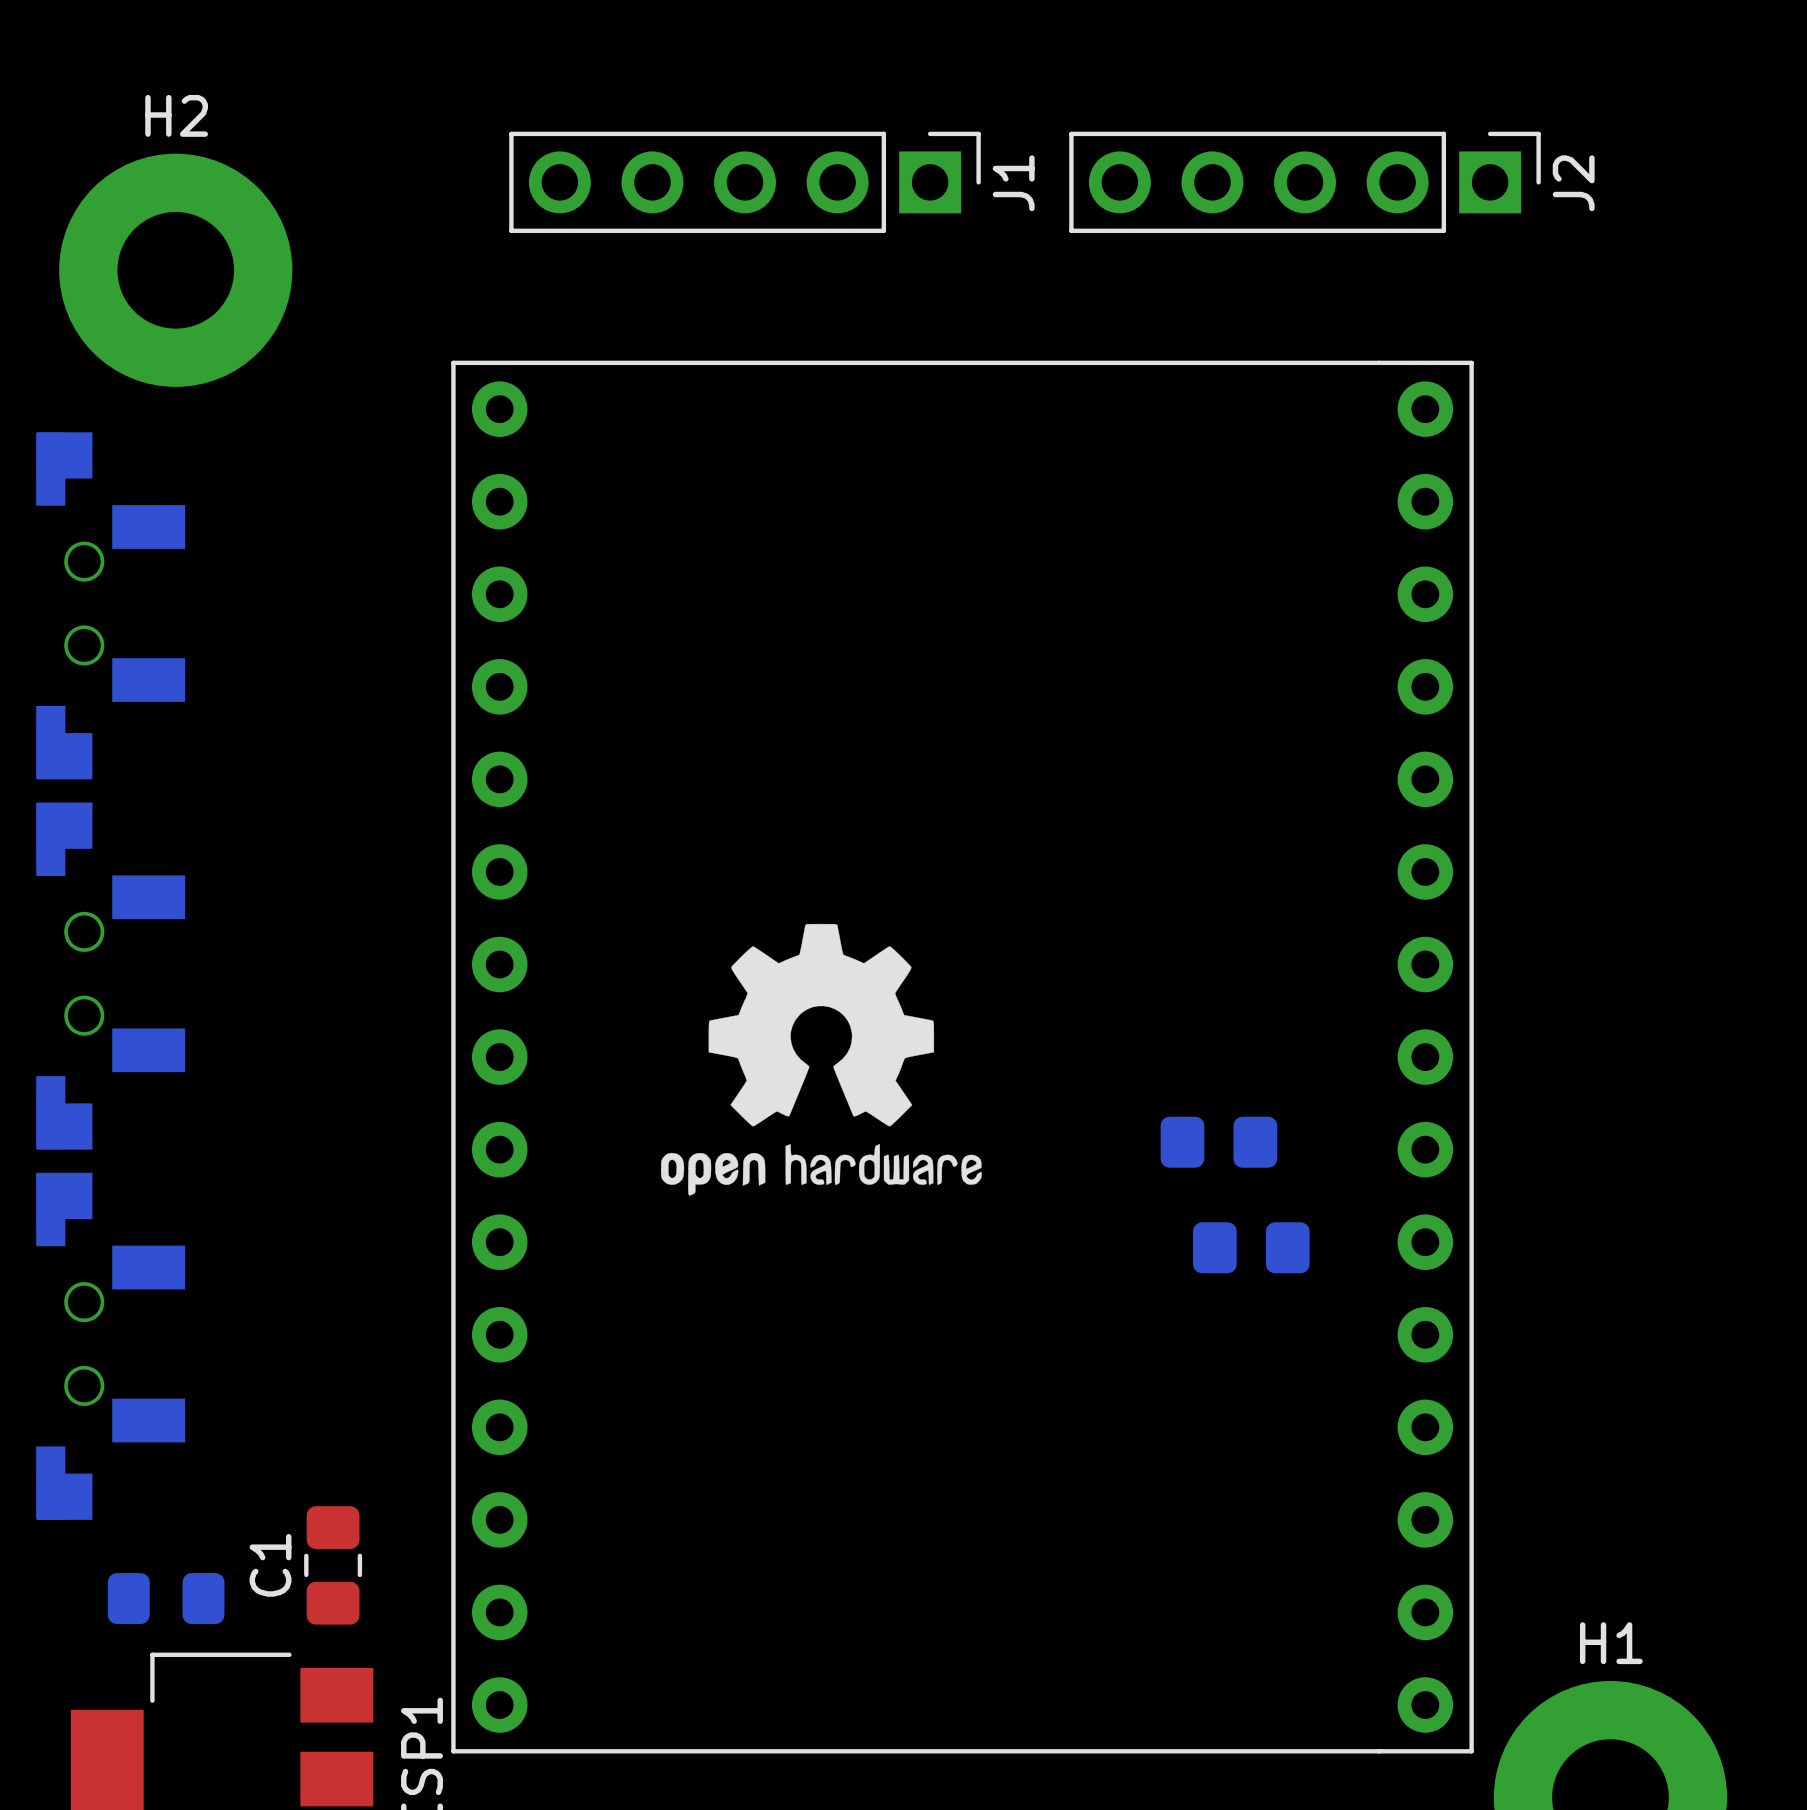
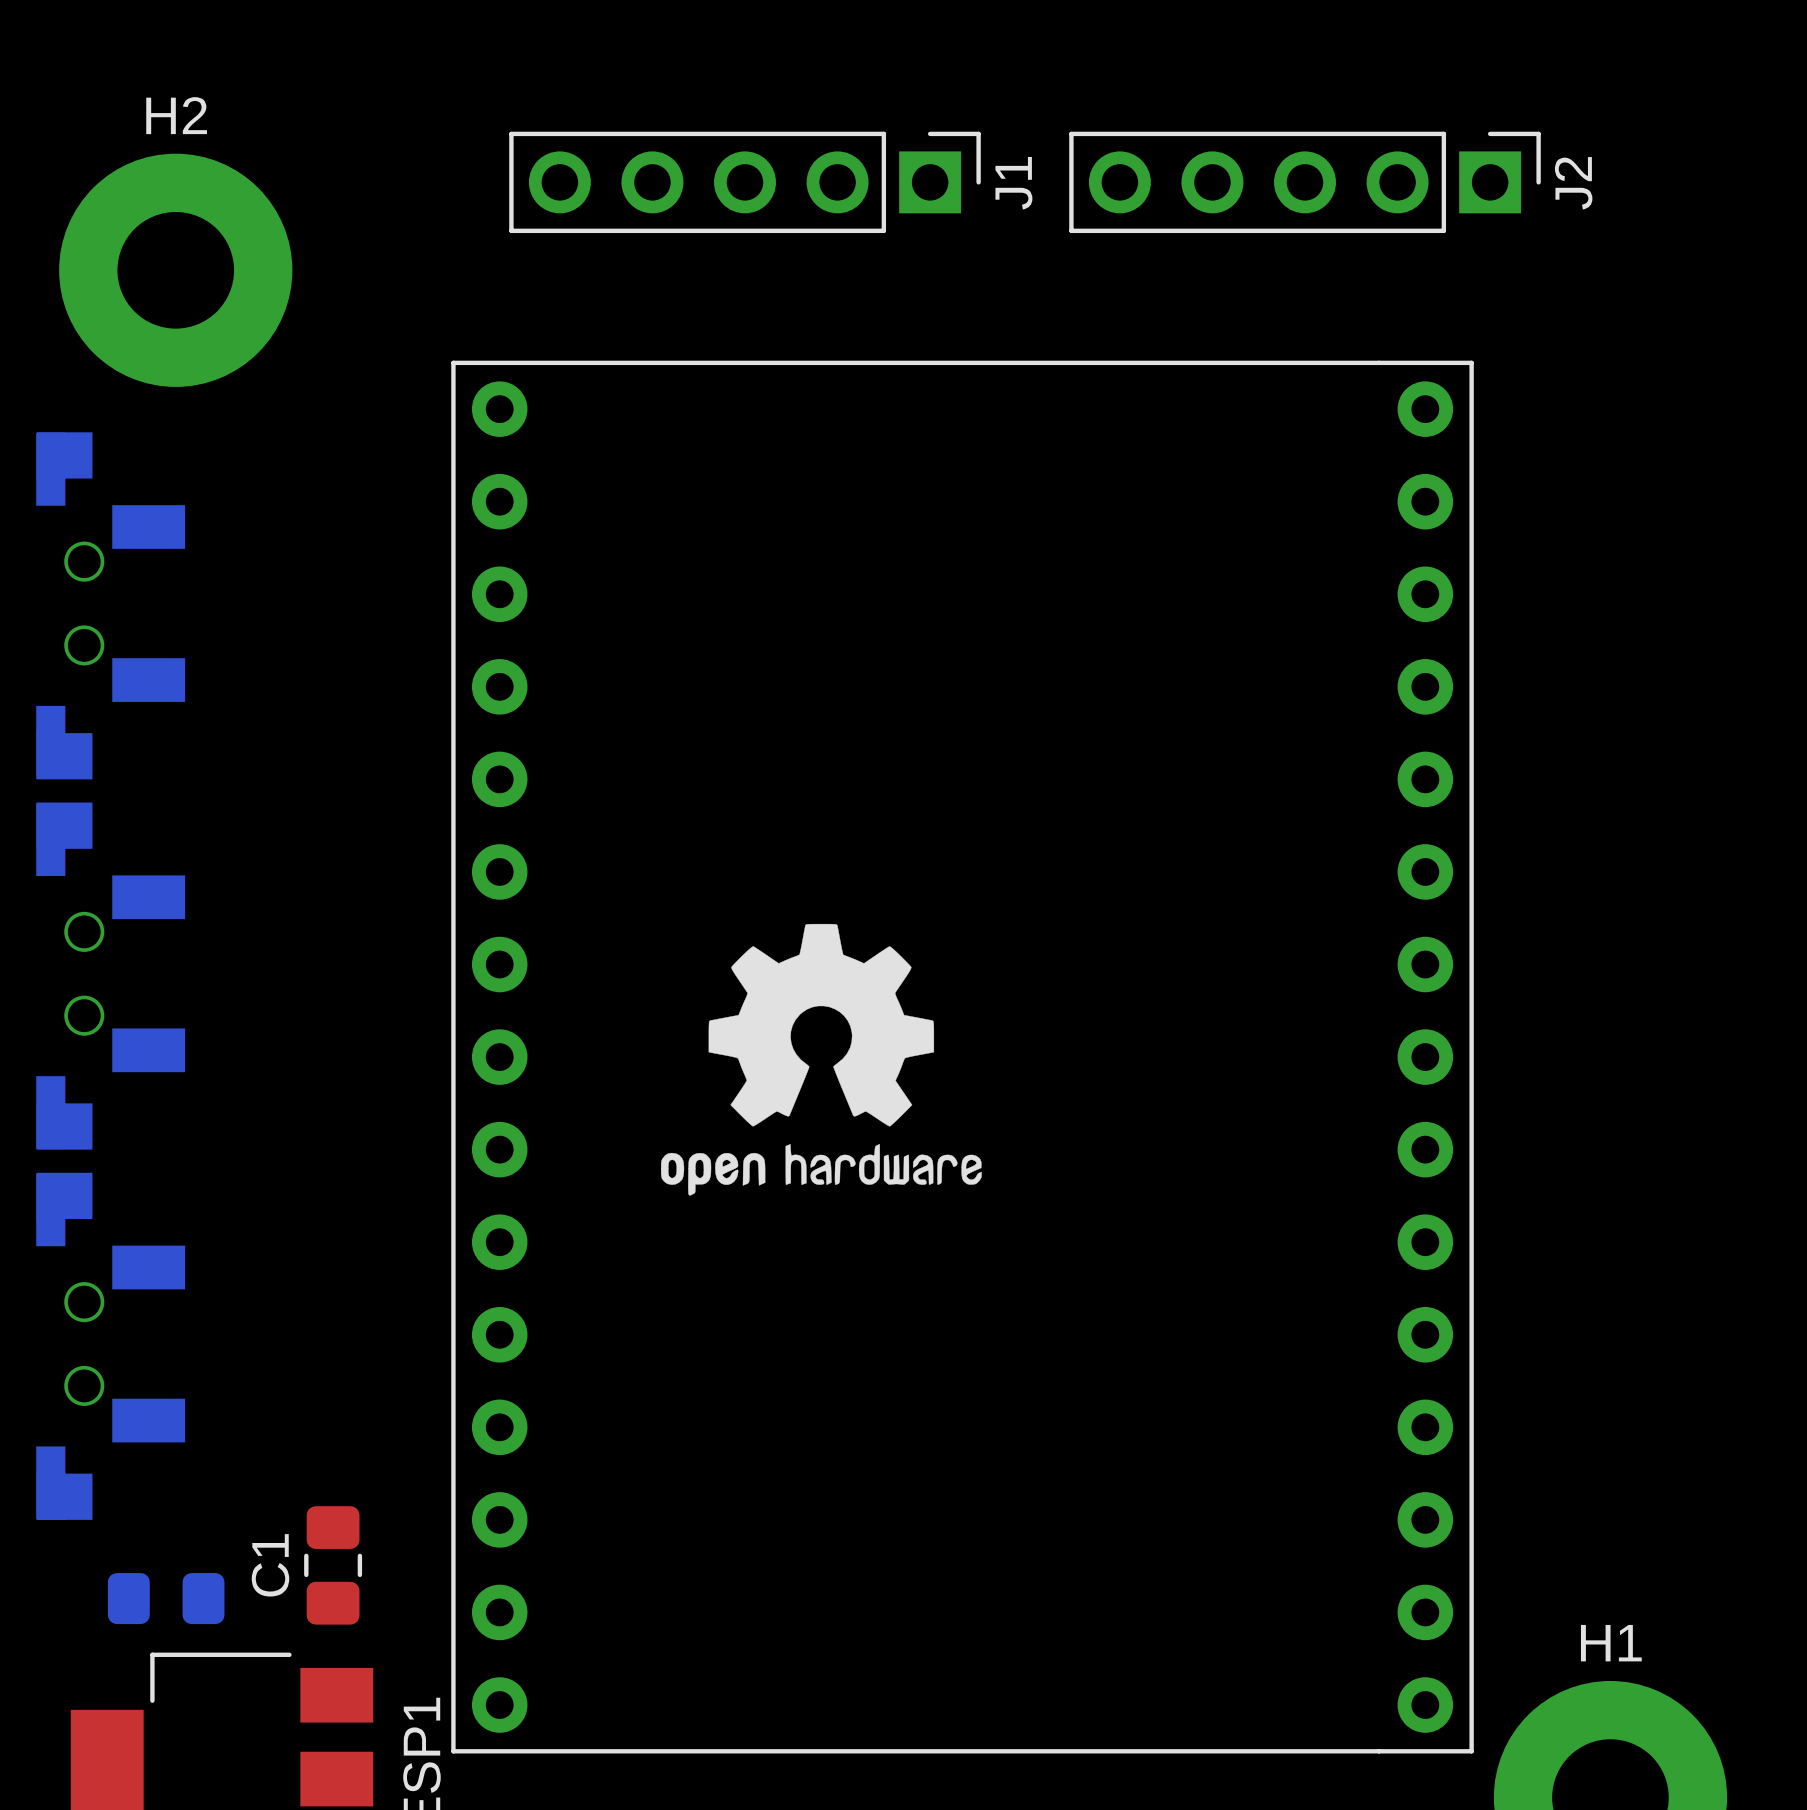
part: (1218, 1142) -> none
part: (1251, 1247) -> none

